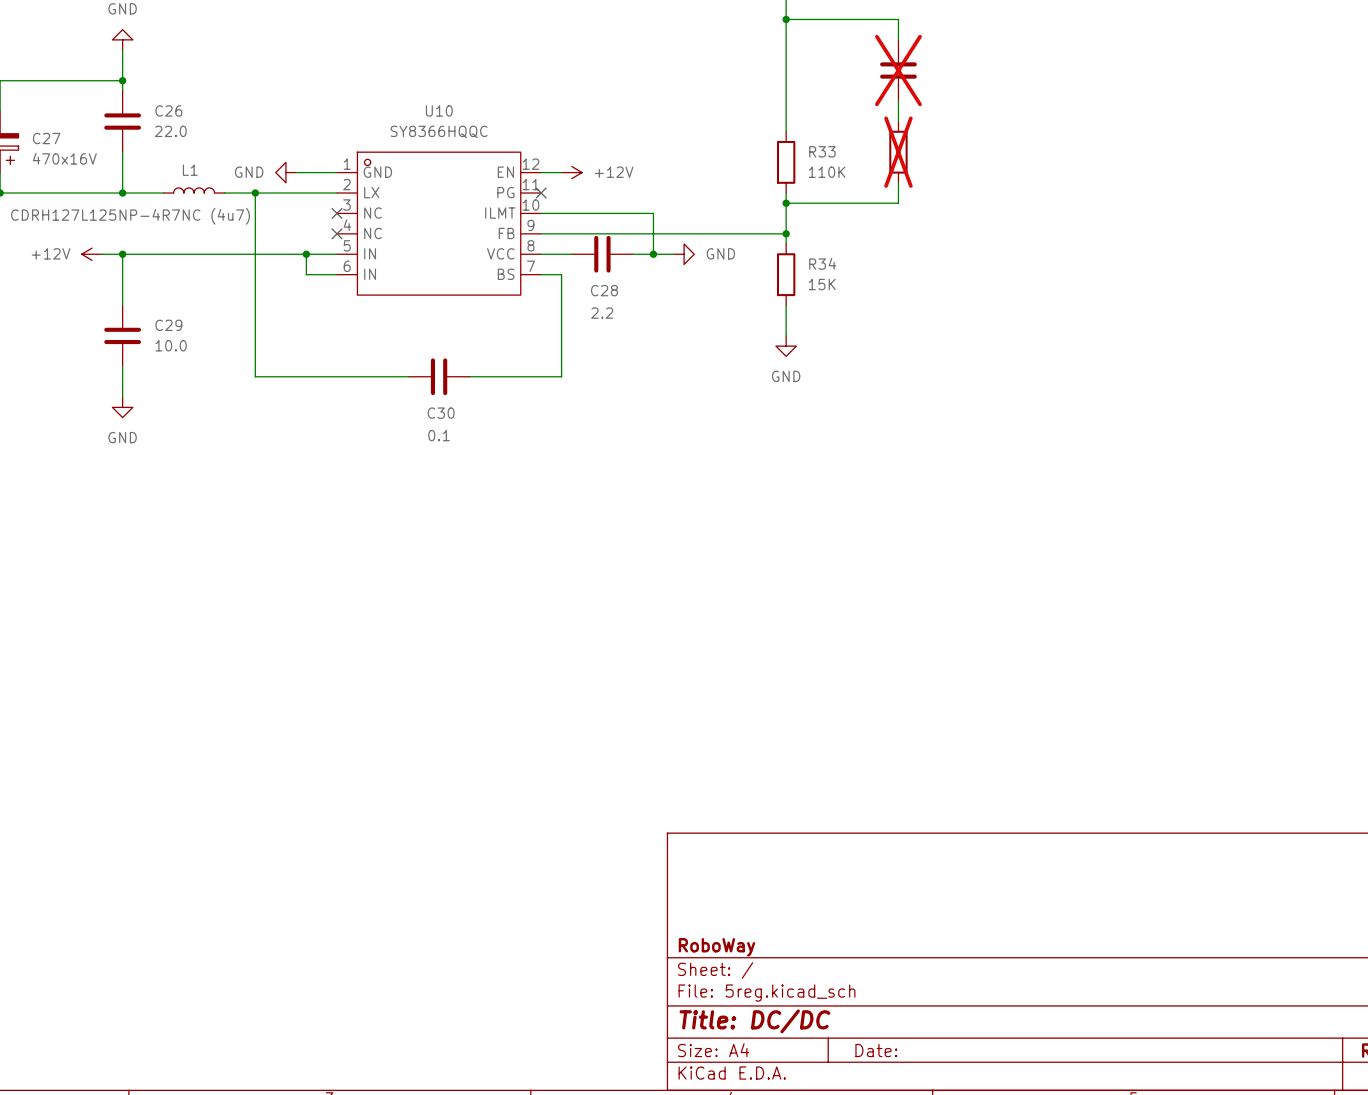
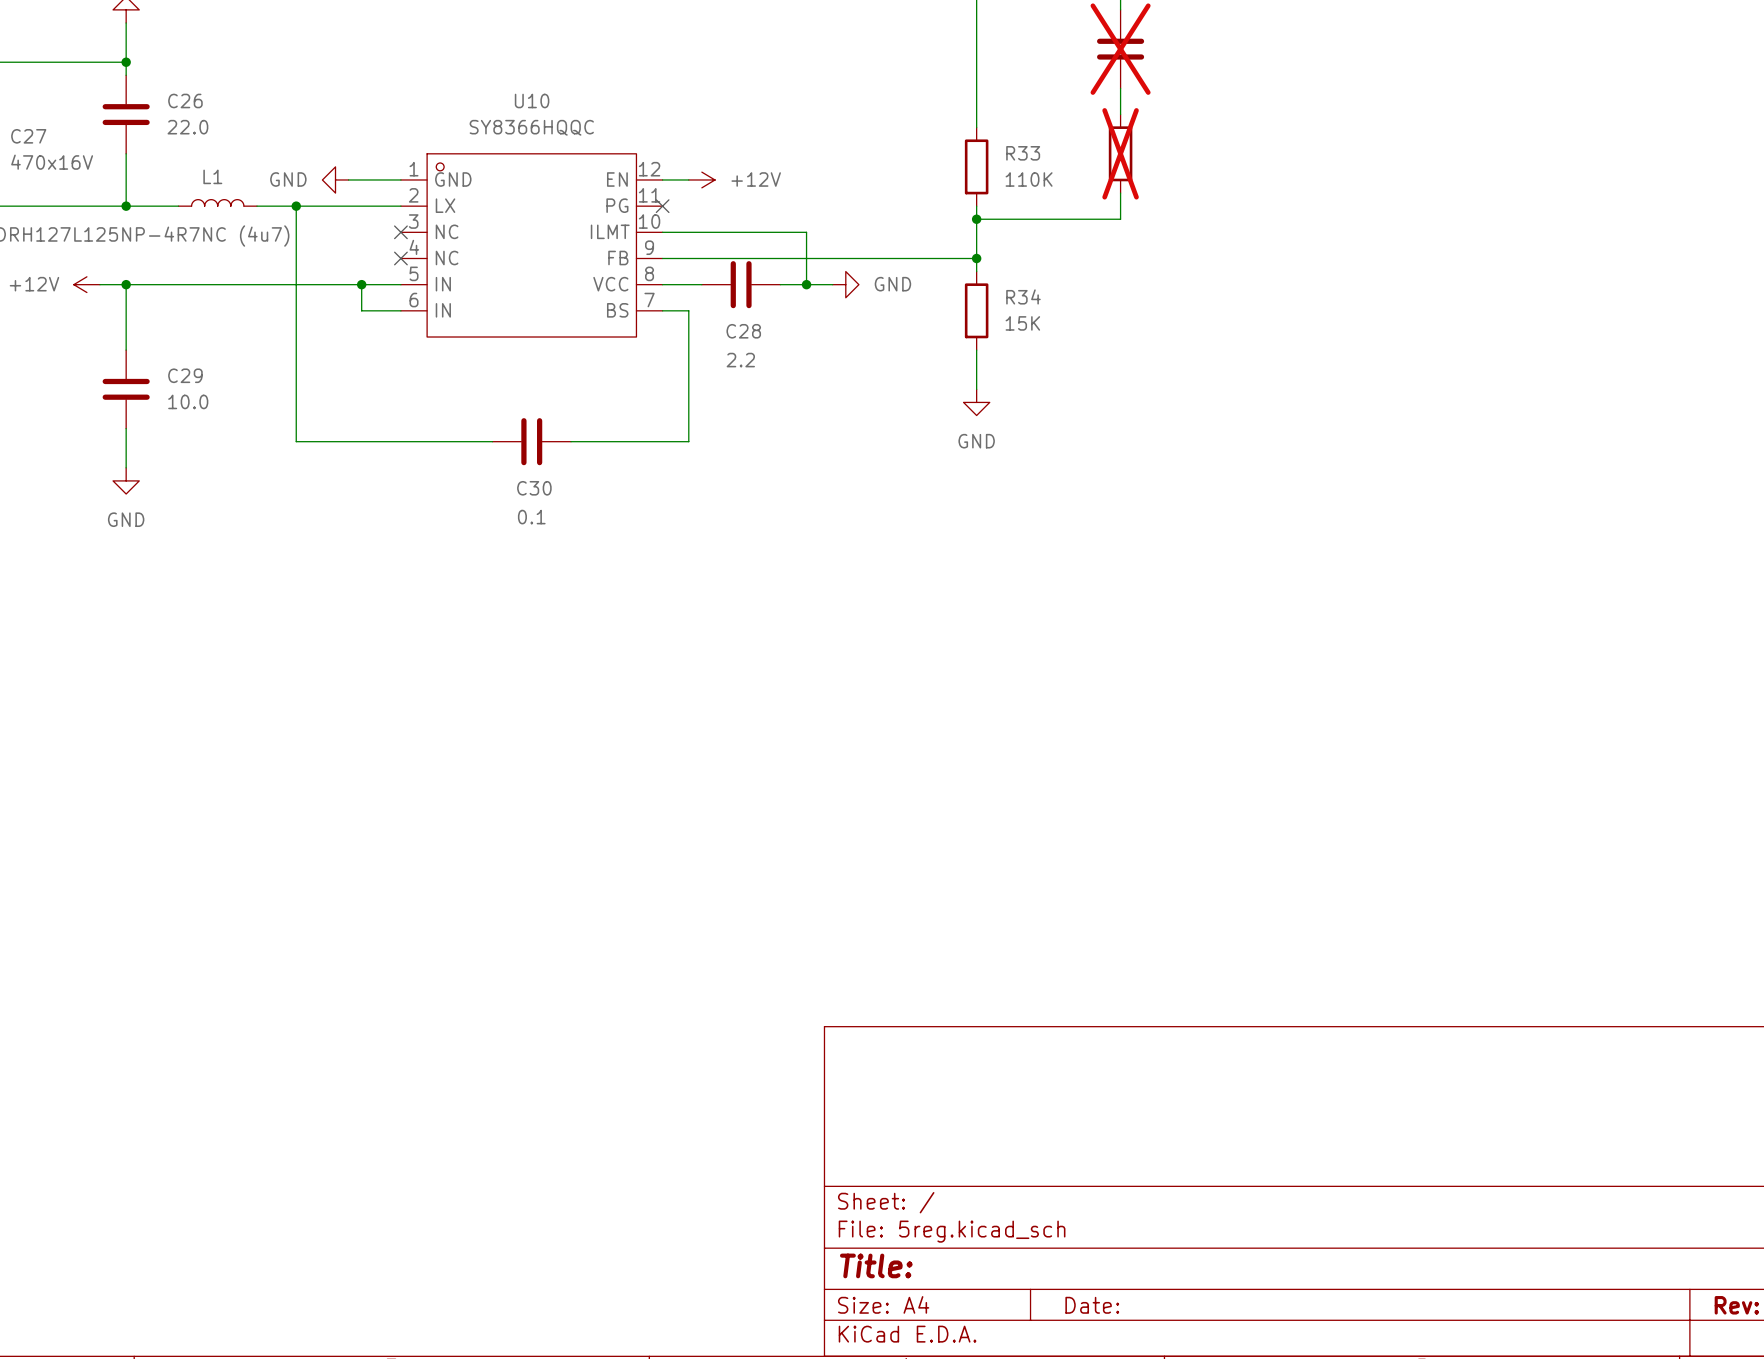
title block: RoboWay (716, 947) -> none
title block: Title: DC/DC (754, 1021) -> Title: (876, 1265)

